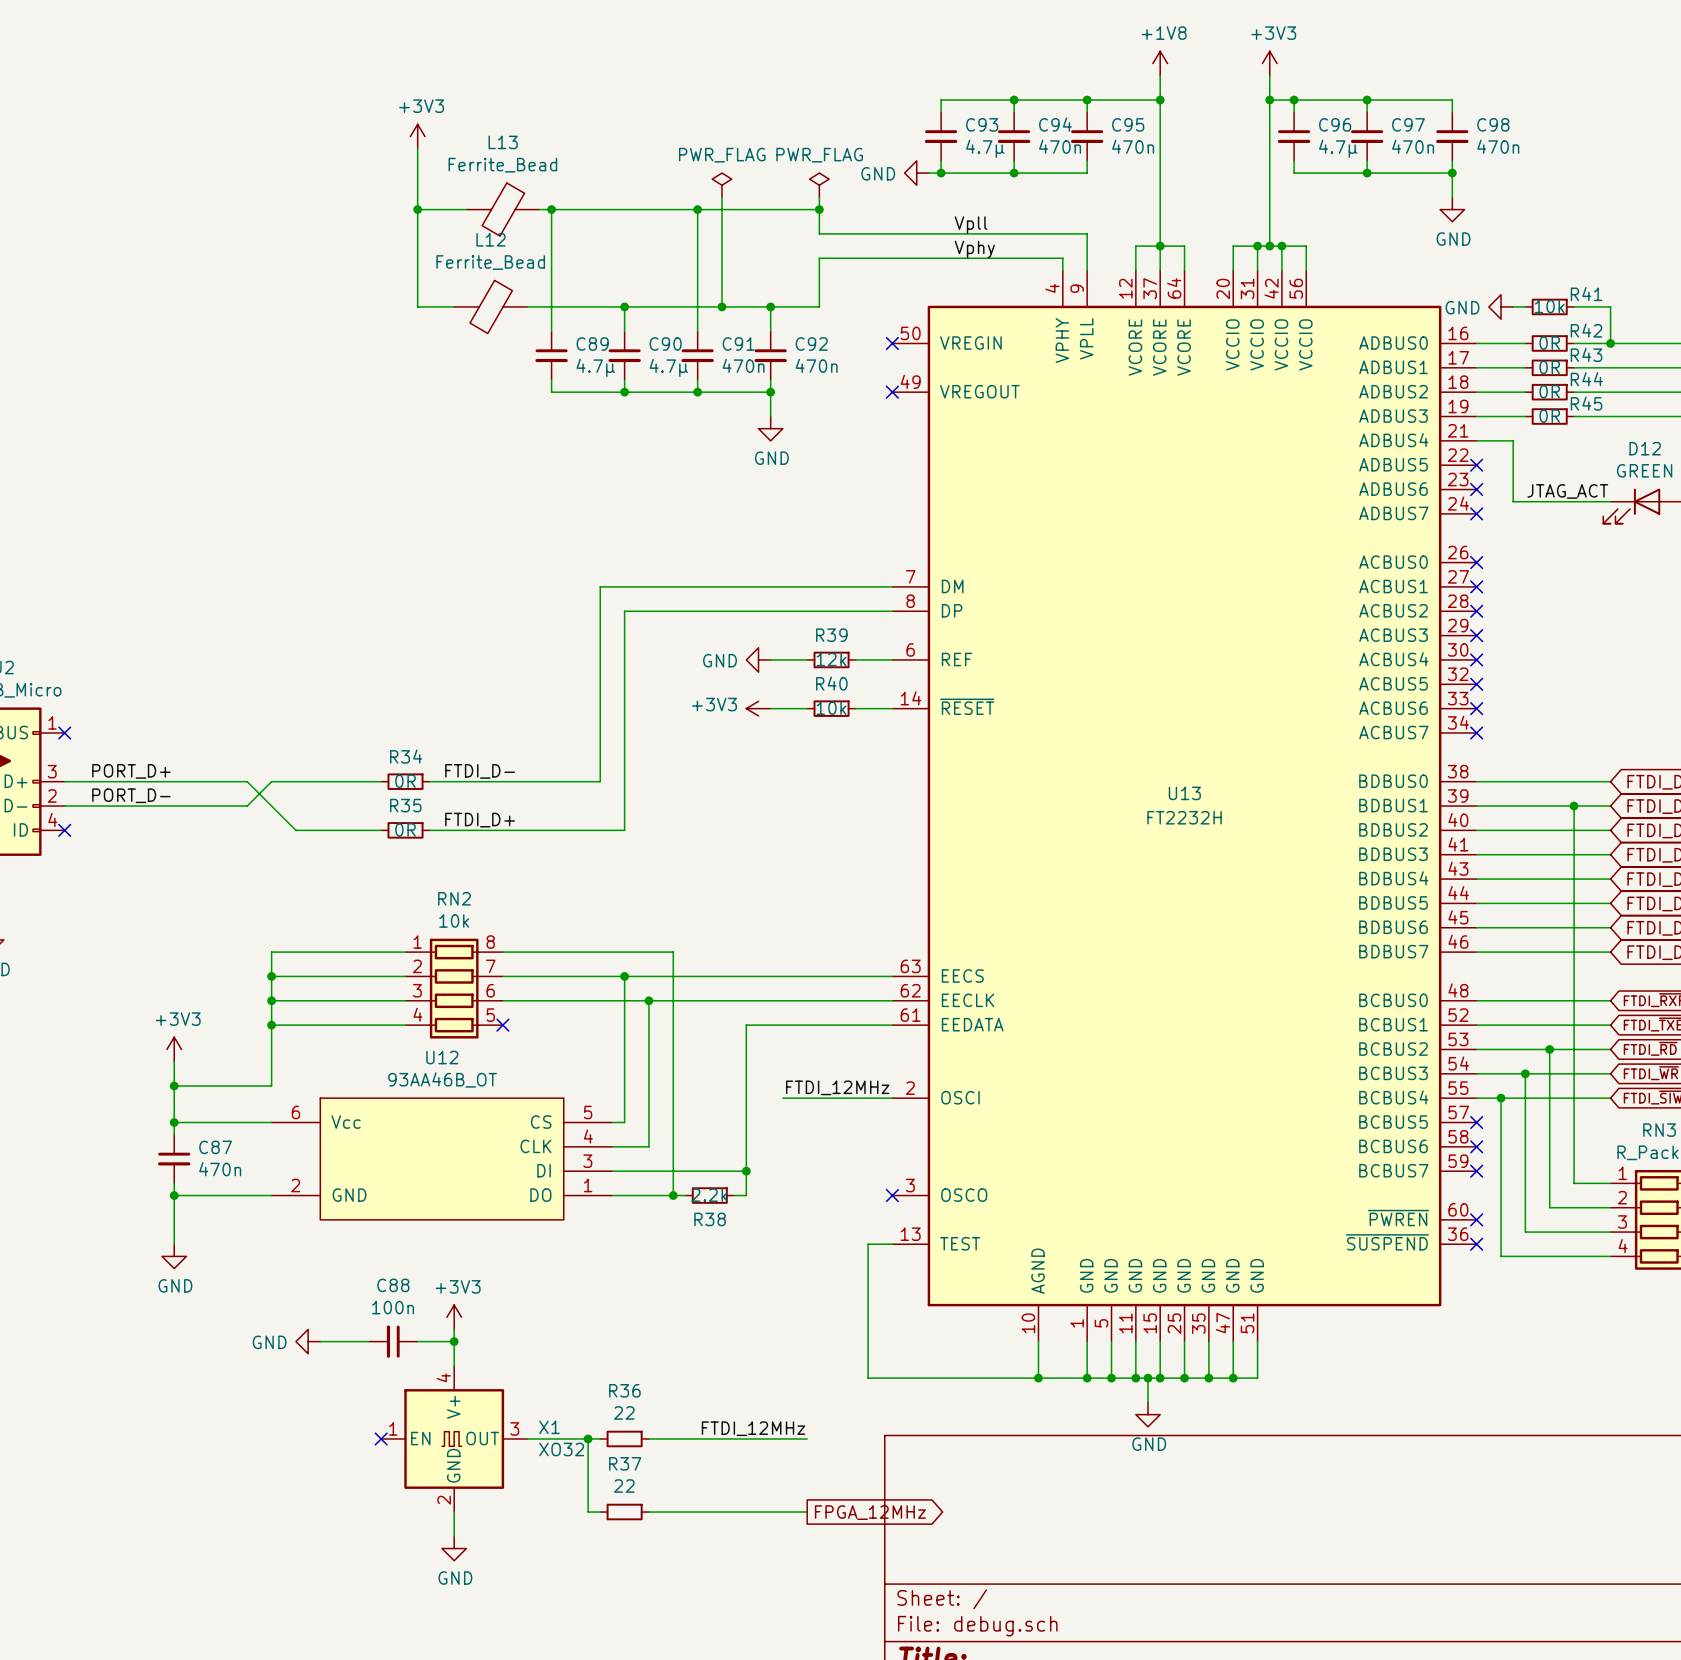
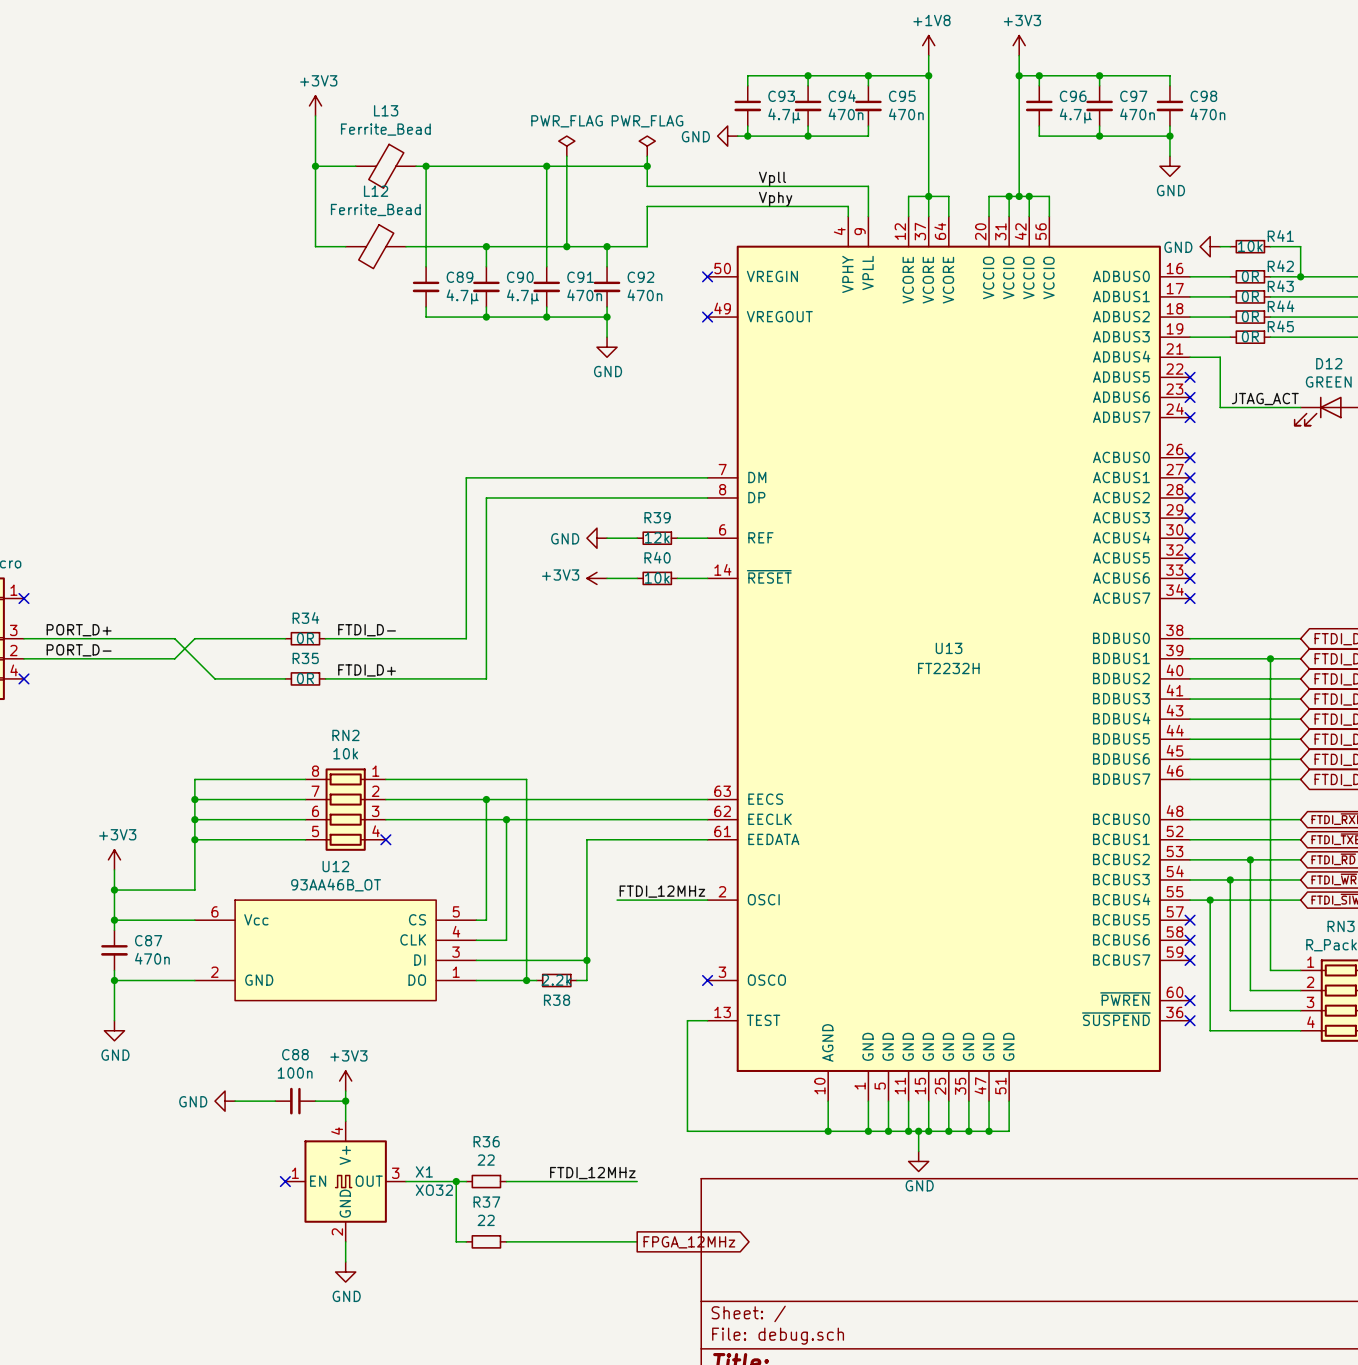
RN2 flip: as is (454, 988) -> left-right (345, 809)

